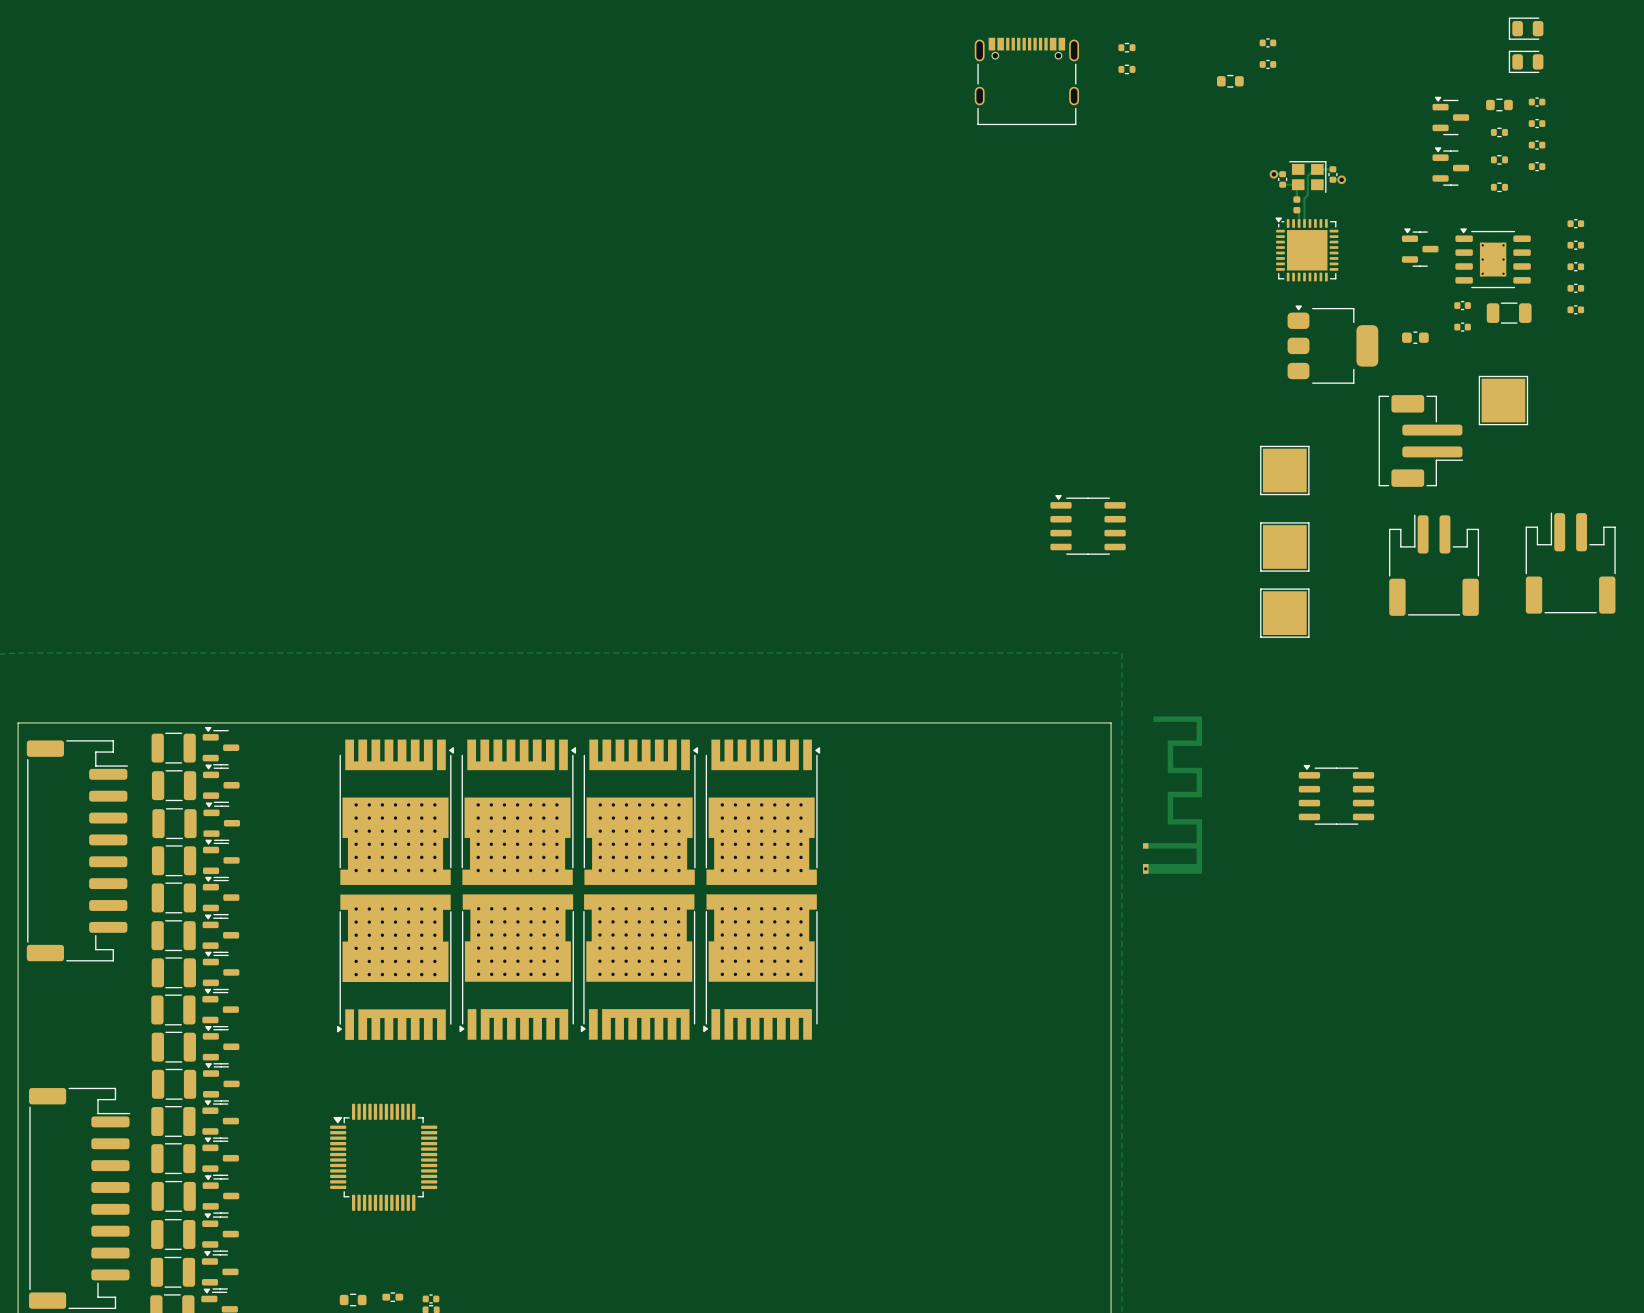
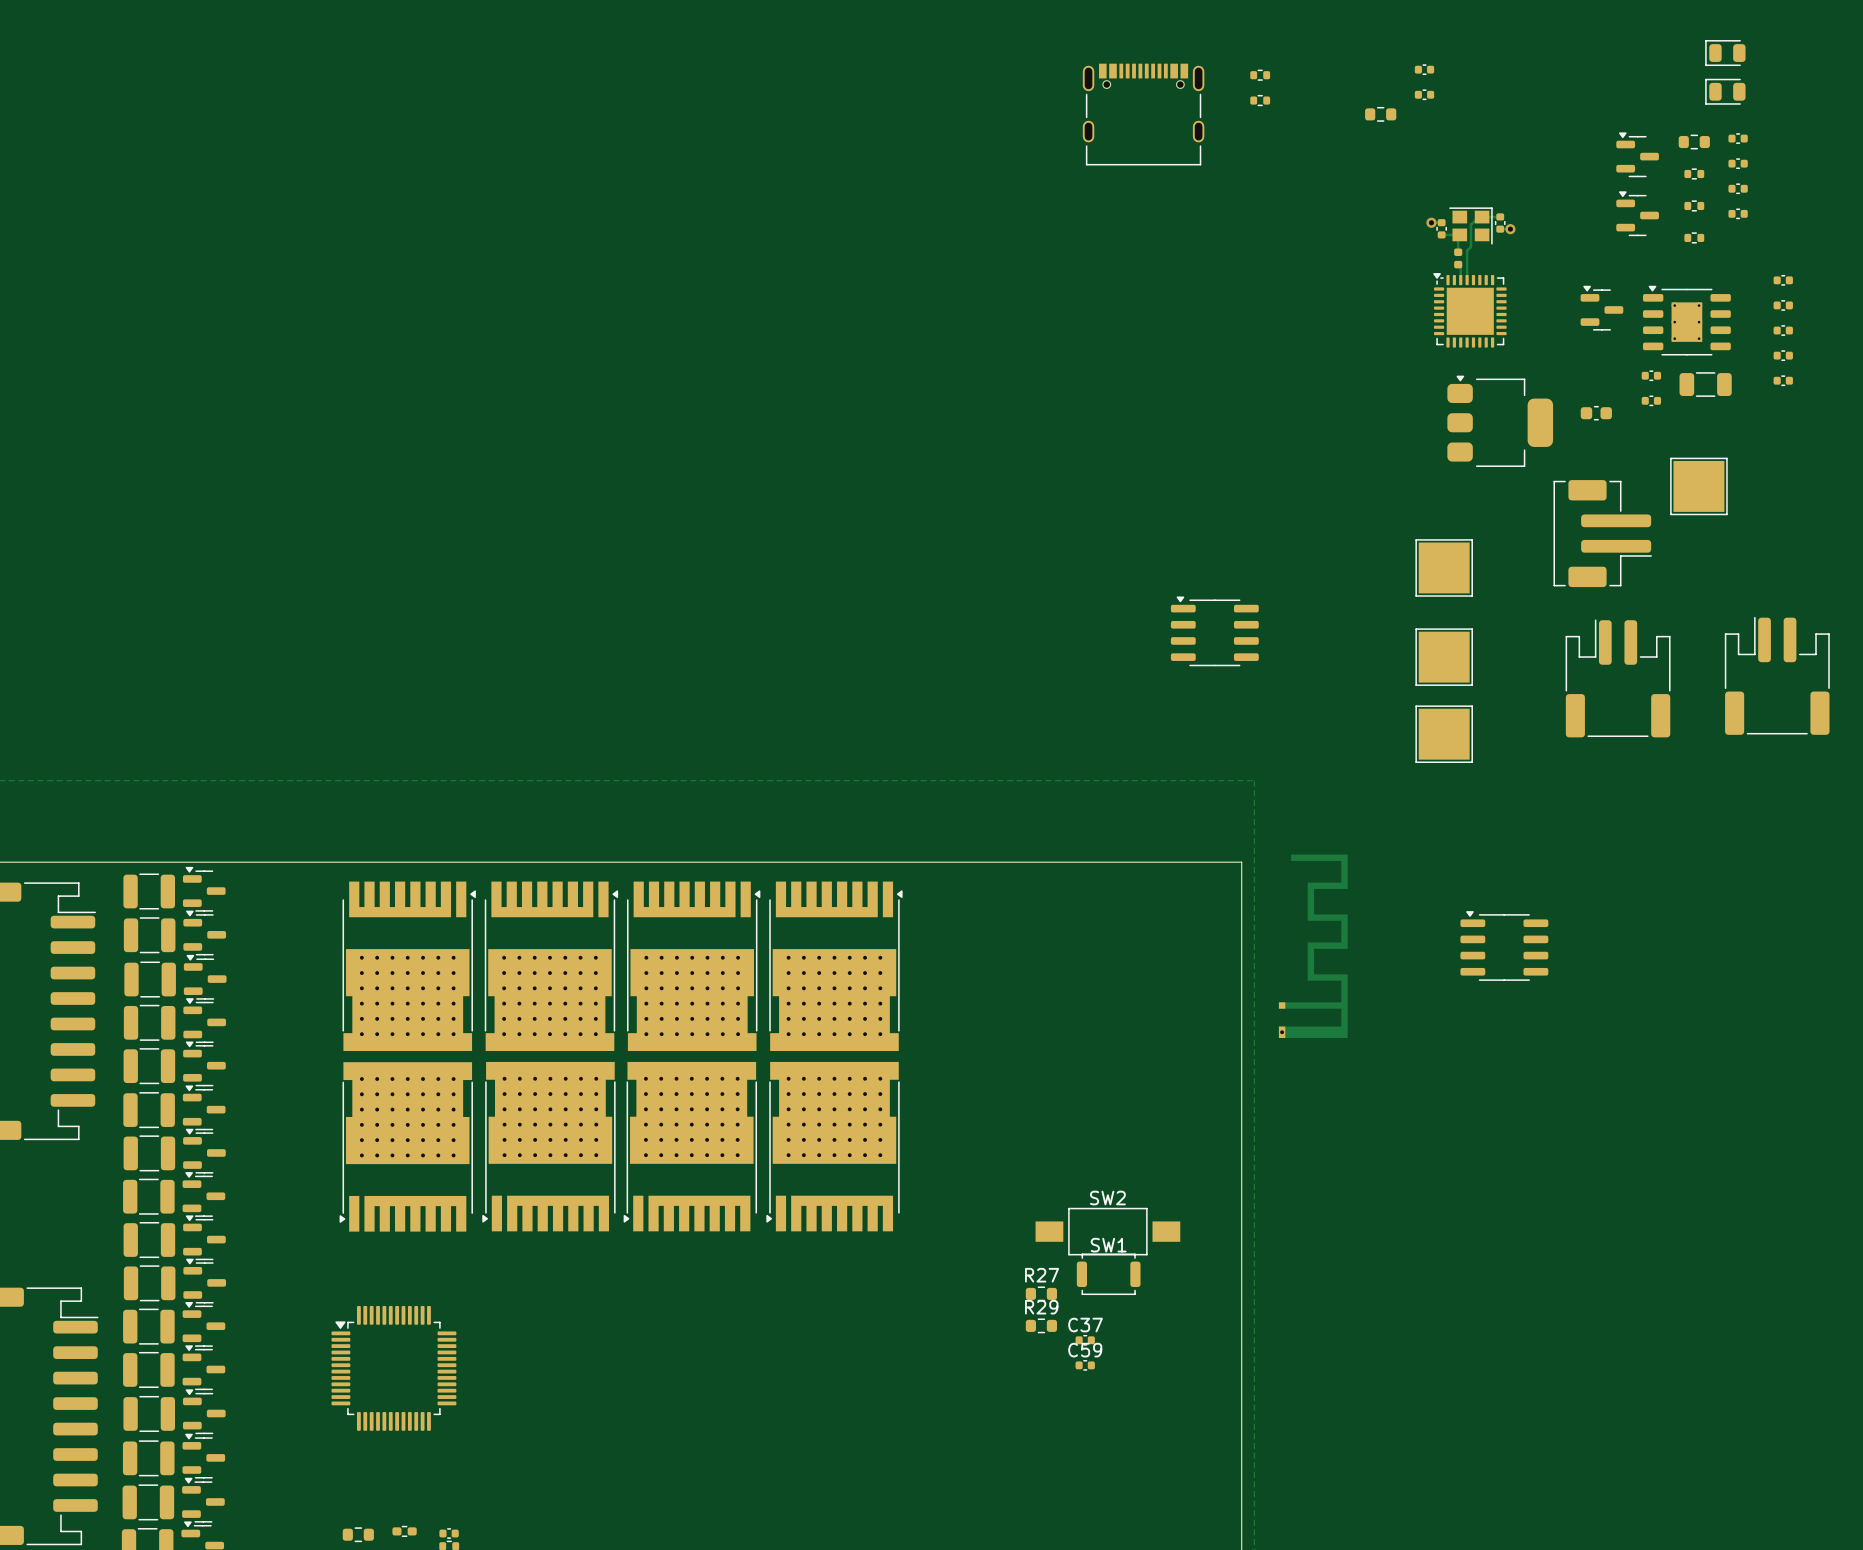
SW2: none -> (1107, 1231)
SW1: none -> (1108, 1274)
R27: none -> (1041, 1293)
R29: none -> (1041, 1325)
C37: none -> (1085, 1340)
C59: none -> (1085, 1365)

